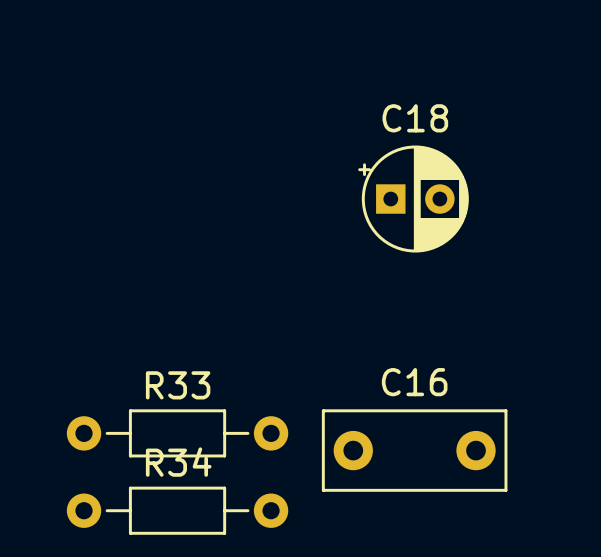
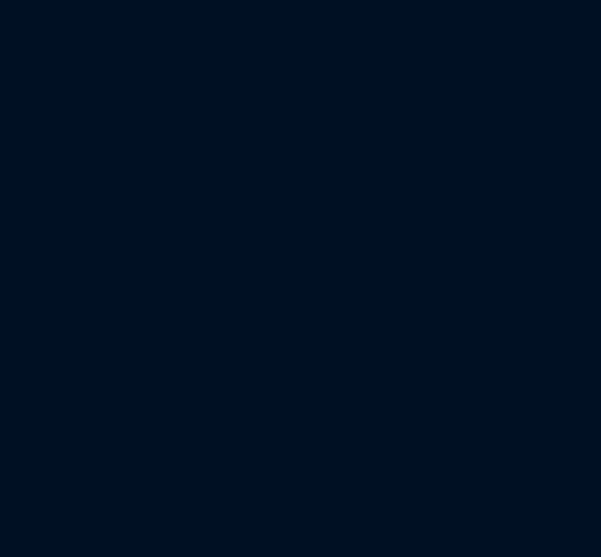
C18: (413, 199) -> none
R33: (177, 433) -> none
C16: (414, 450) -> none
R34: (177, 510) -> none

